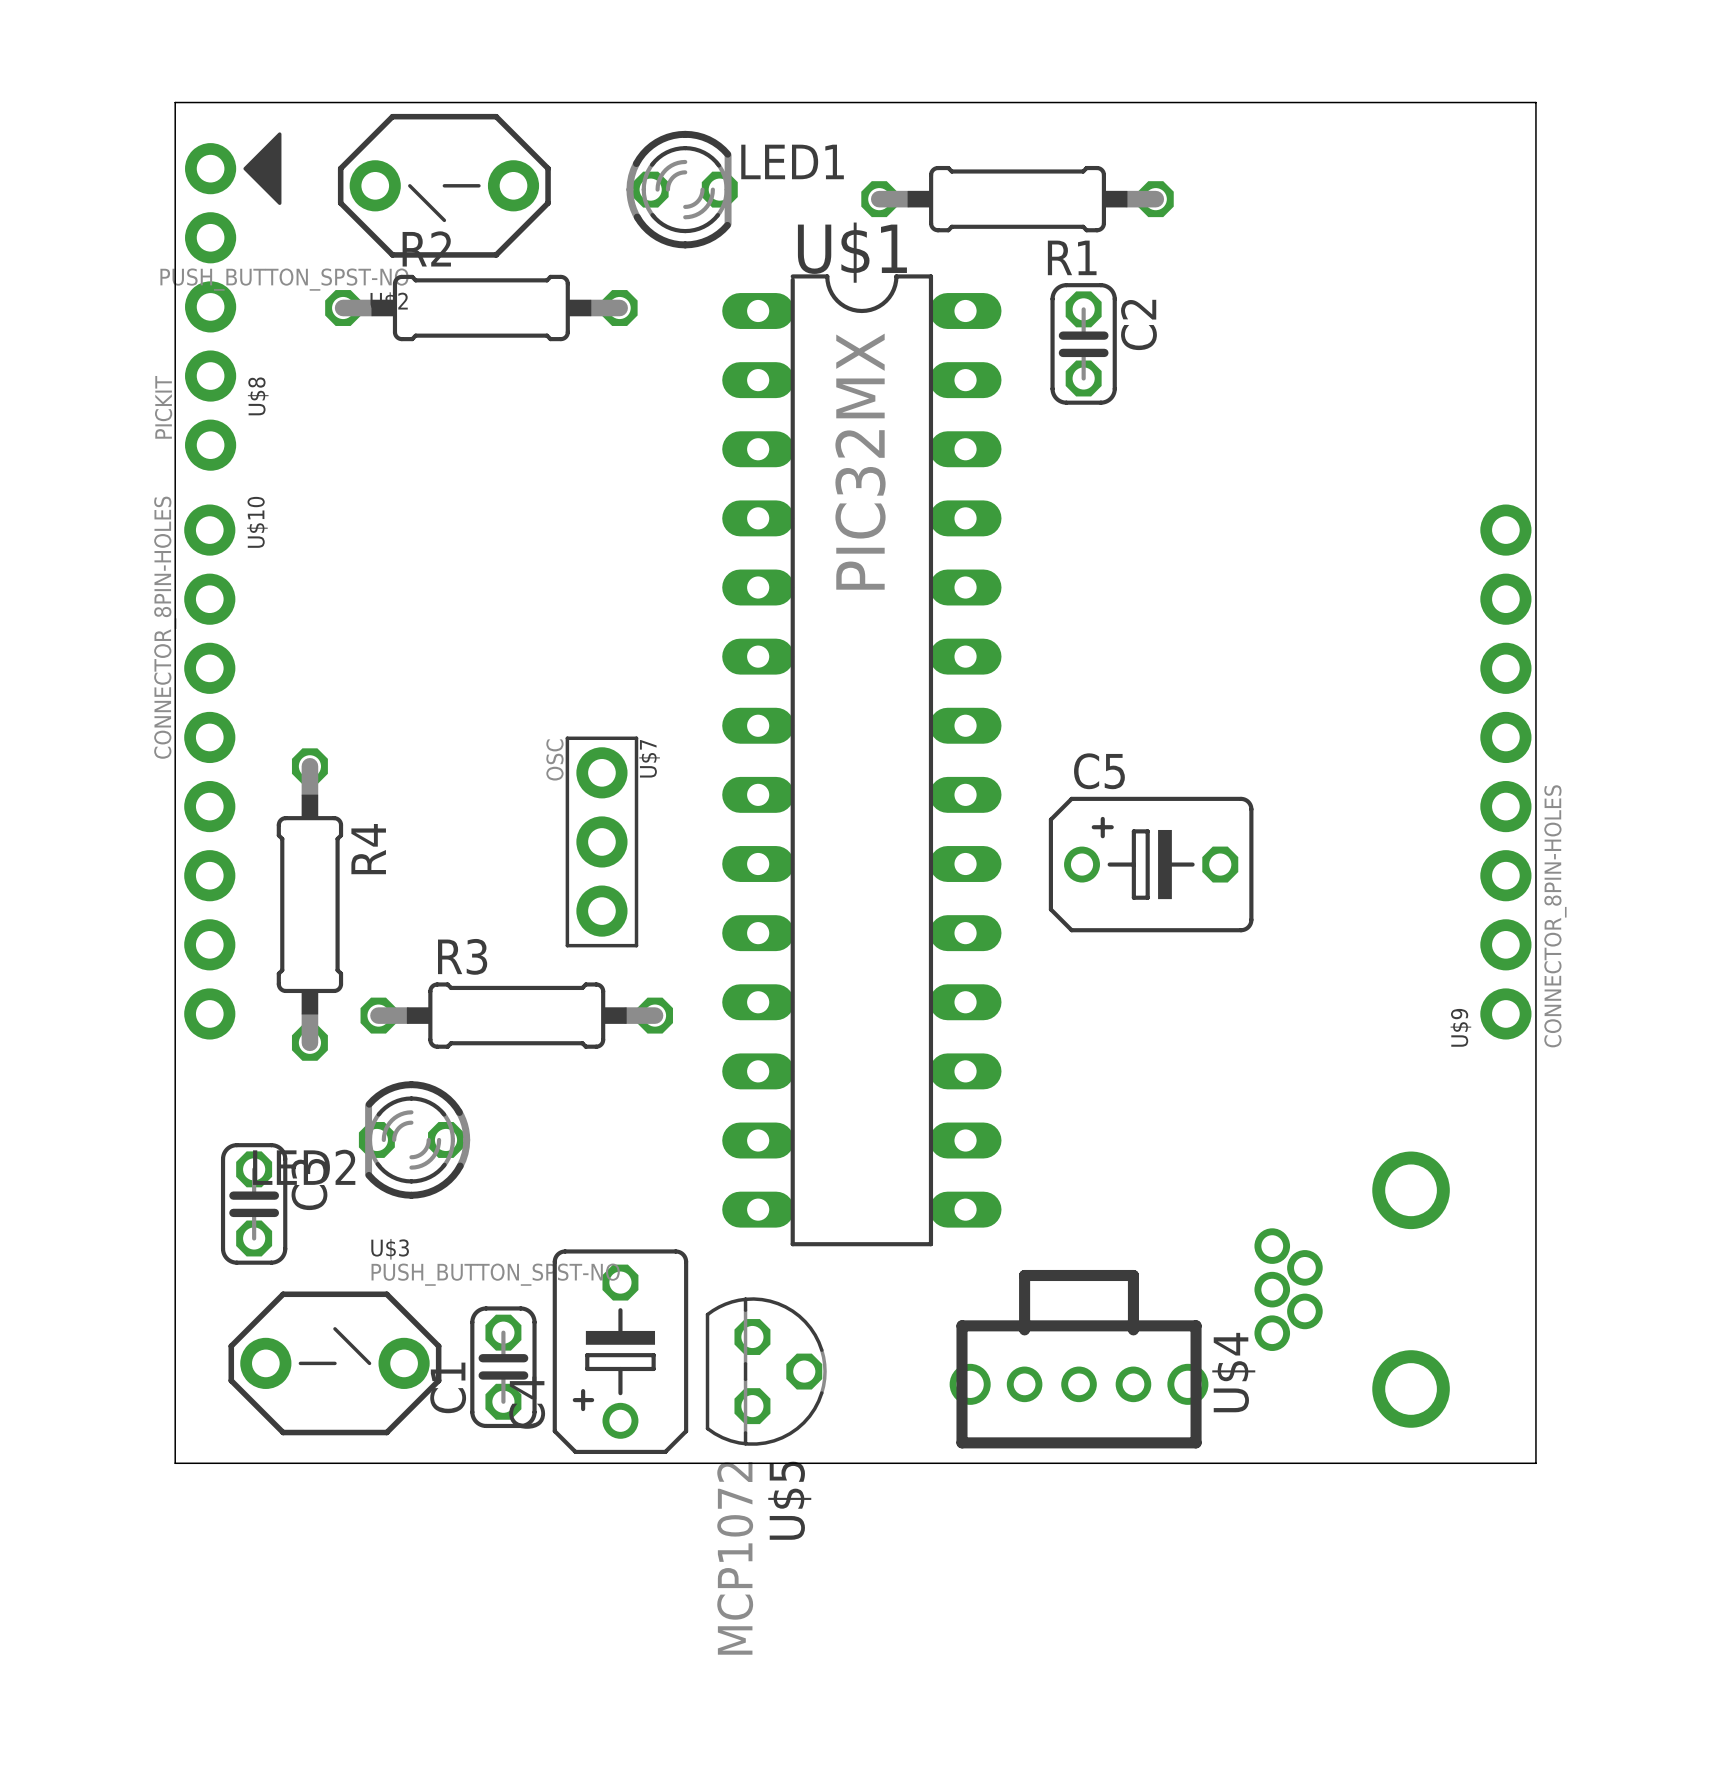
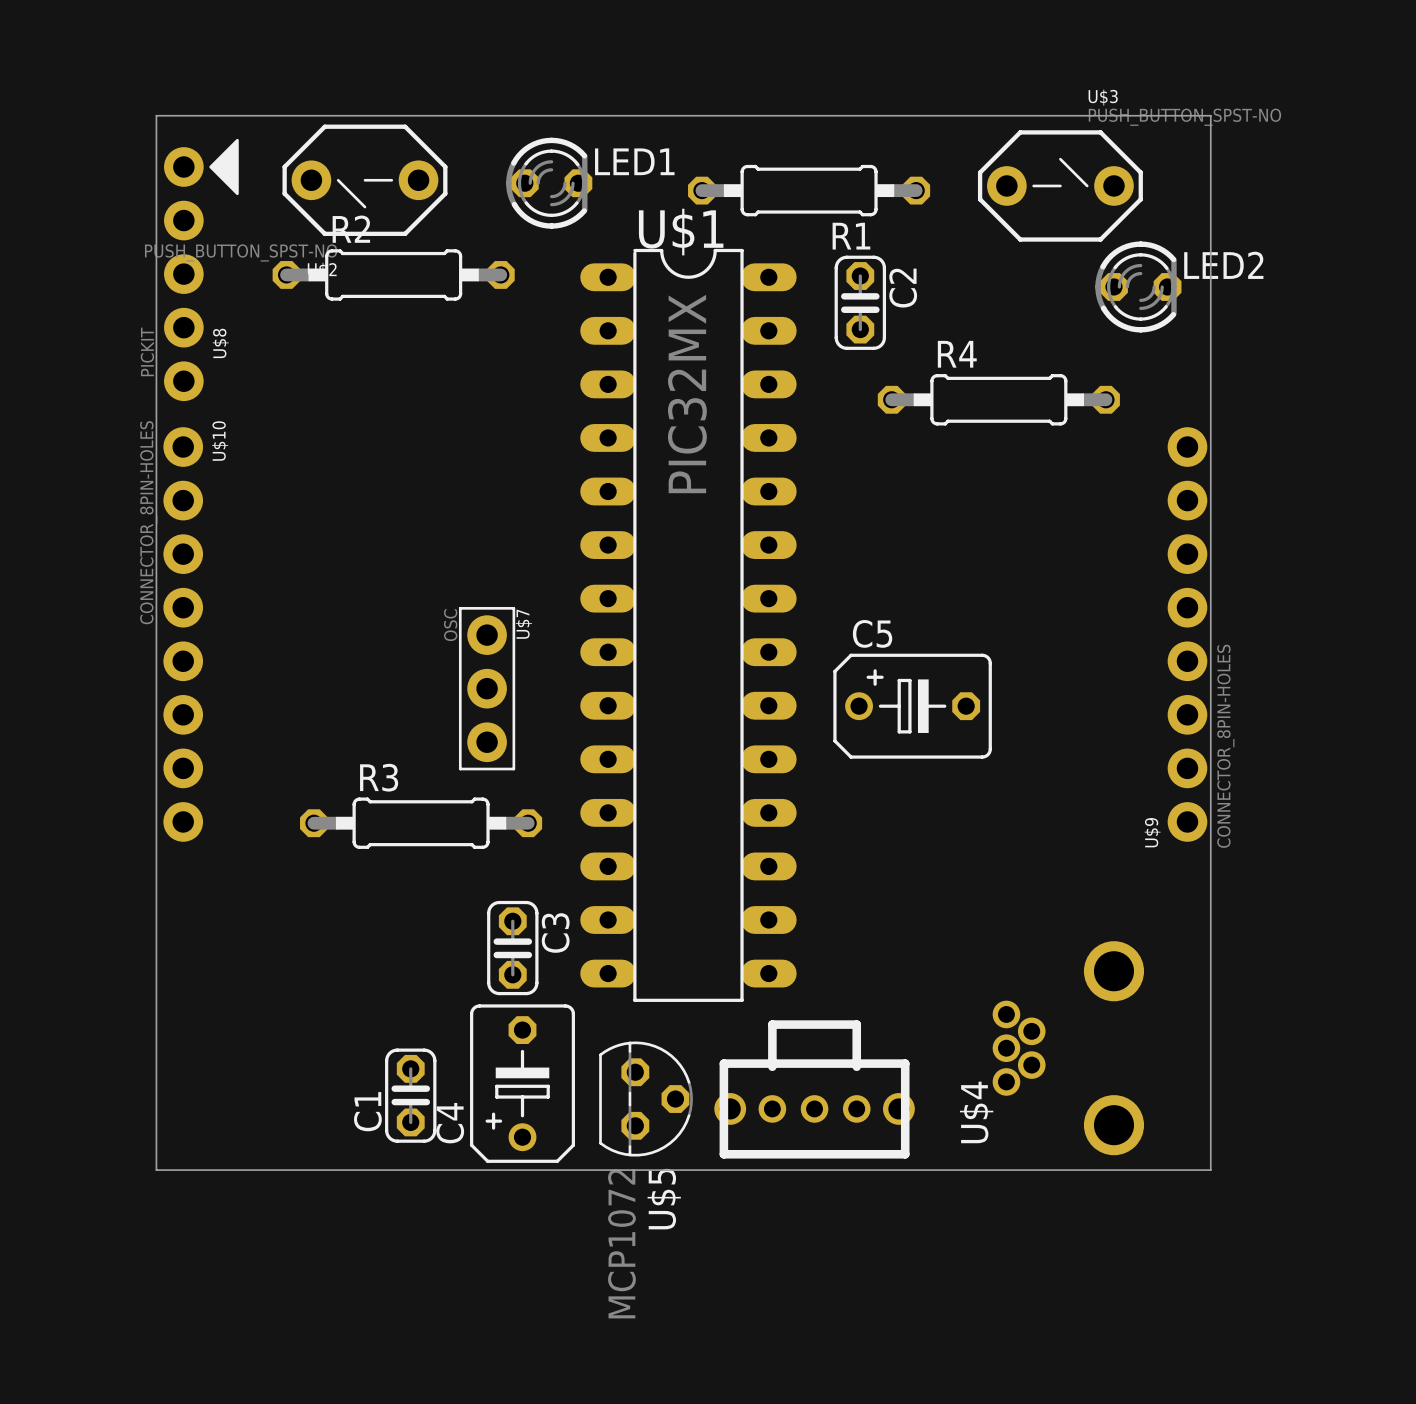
R4 name position: R4 (368, 849) -> R4 (957, 354)
R4 rotation: 0° (309, 904) -> 90° clockwise (998, 399)
R4 position: (309, 904) -> (998, 399)
LED2 rotation: 0° (414, 1139) -> 180° (1138, 286)
LED2 position: (414, 1139) -> (1138, 286)
C3 position: (254, 1203) -> (512, 948)
U$4 position: (1352, 1289) -> (1068, 1048)
C4 position: (620, 1351) -> (522, 1083)
part position: (1079, 1359) -> (814, 1089)
U$3 position: (334, 1363) -> (1060, 185)
U$5 position: (766, 1371) -> (646, 1098)

